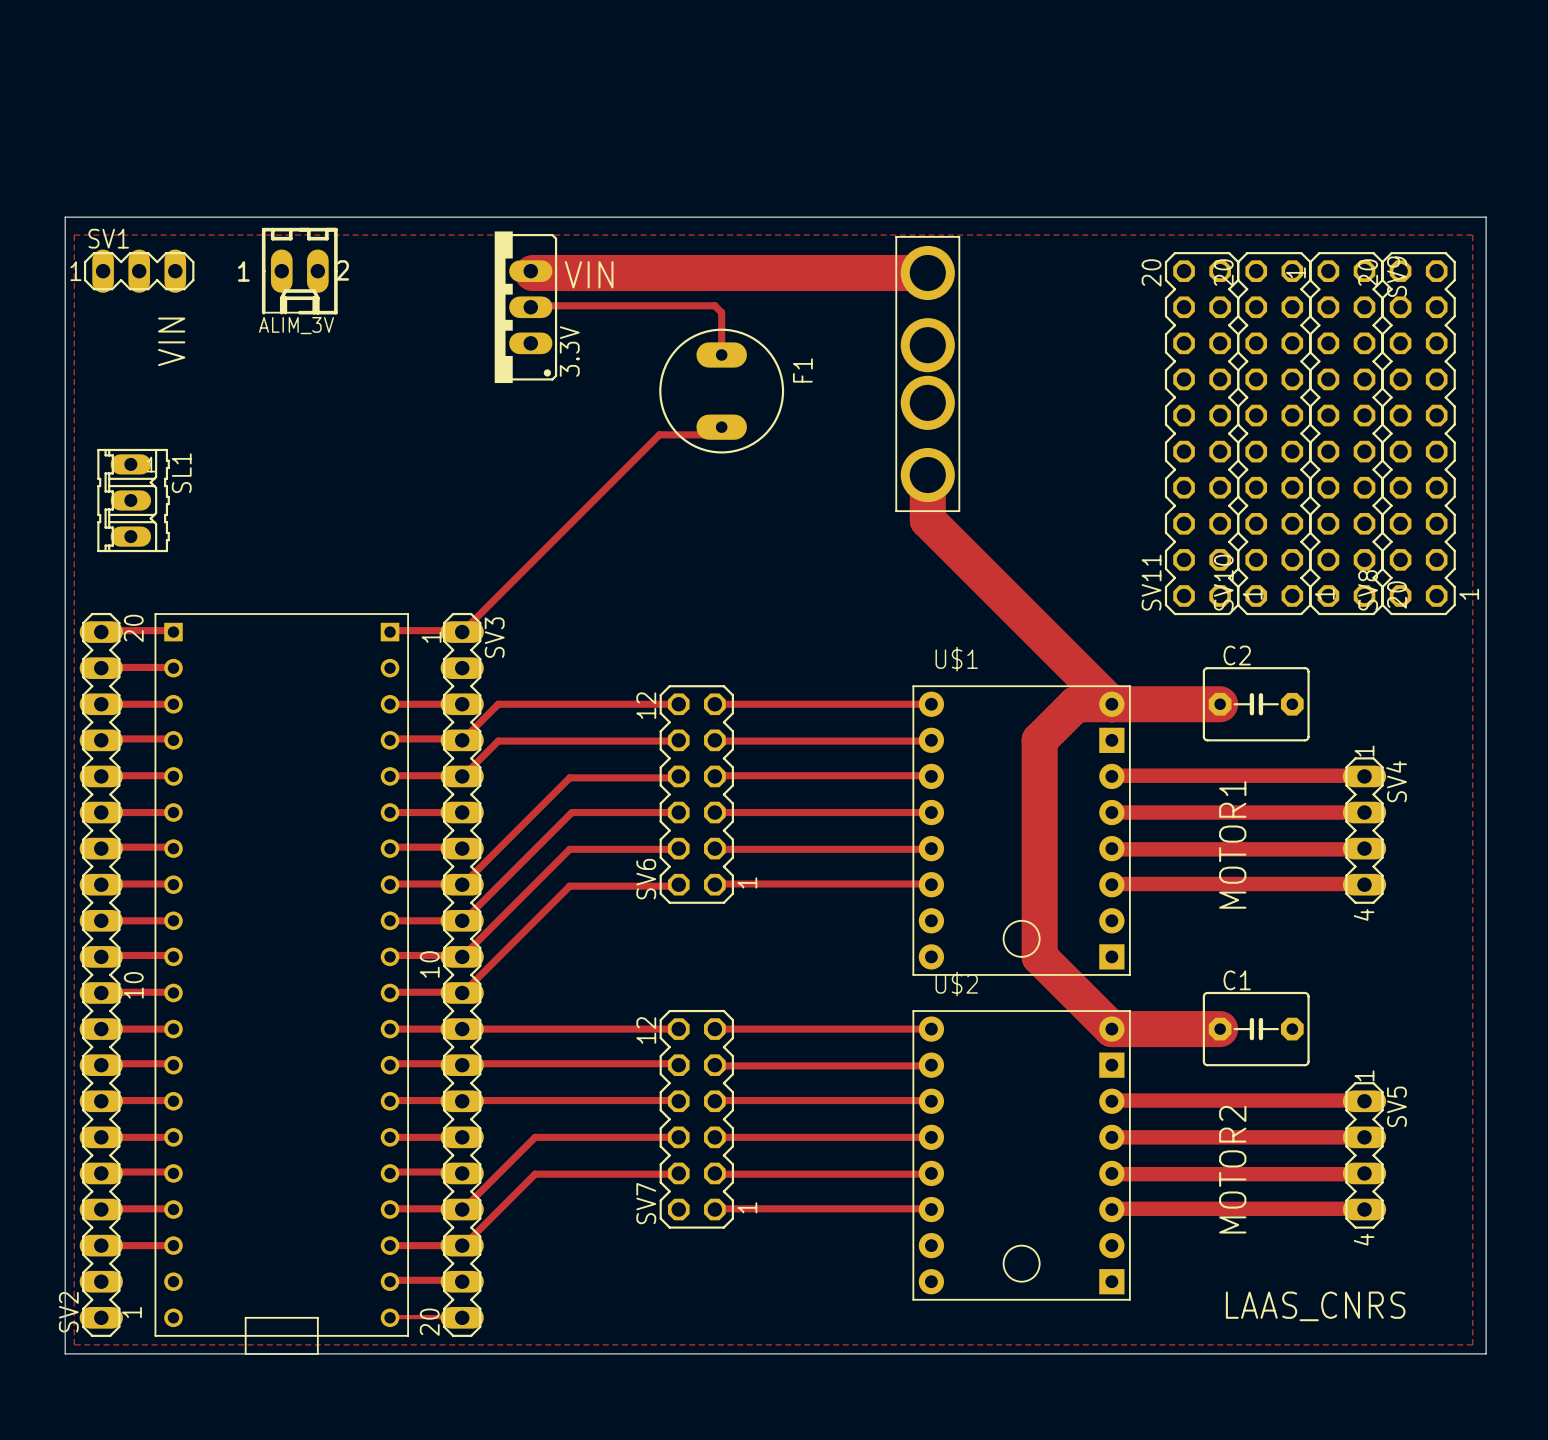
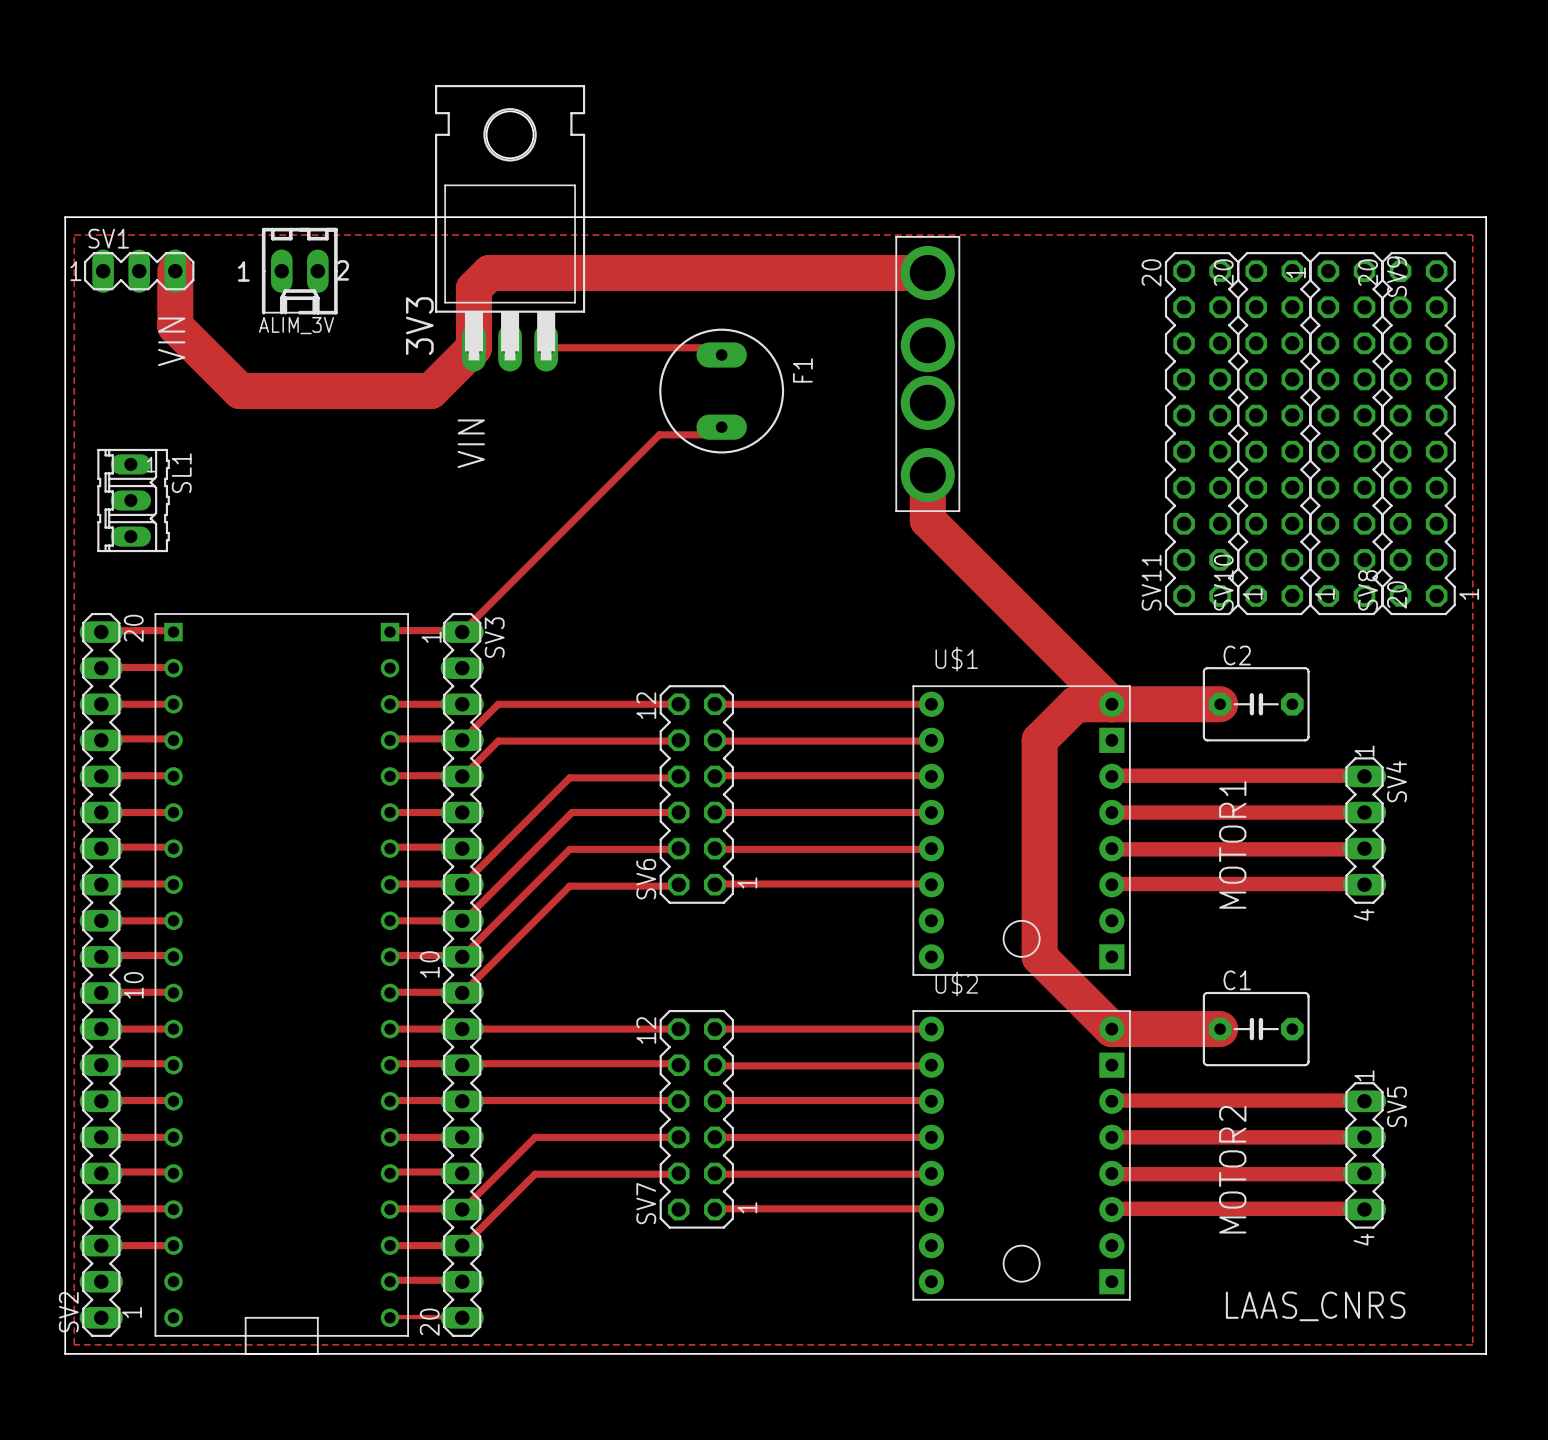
3V3: none -> (510, 228)
track: none -> (175, 271) (175, 326) (240, 391) (430, 391) (473, 347) (473, 288) (489, 272) (532, 272)
text rotation: 0° (589, 274) -> 90° counterclockwise (471, 443)
text position: VIN (589, 274) -> VIN (471, 443)
3.3V: (525, 307) -> none
track: (530, 307) (714, 305) (721, 312) (721, 354) -> (546, 347) (714, 347) (721, 354)

